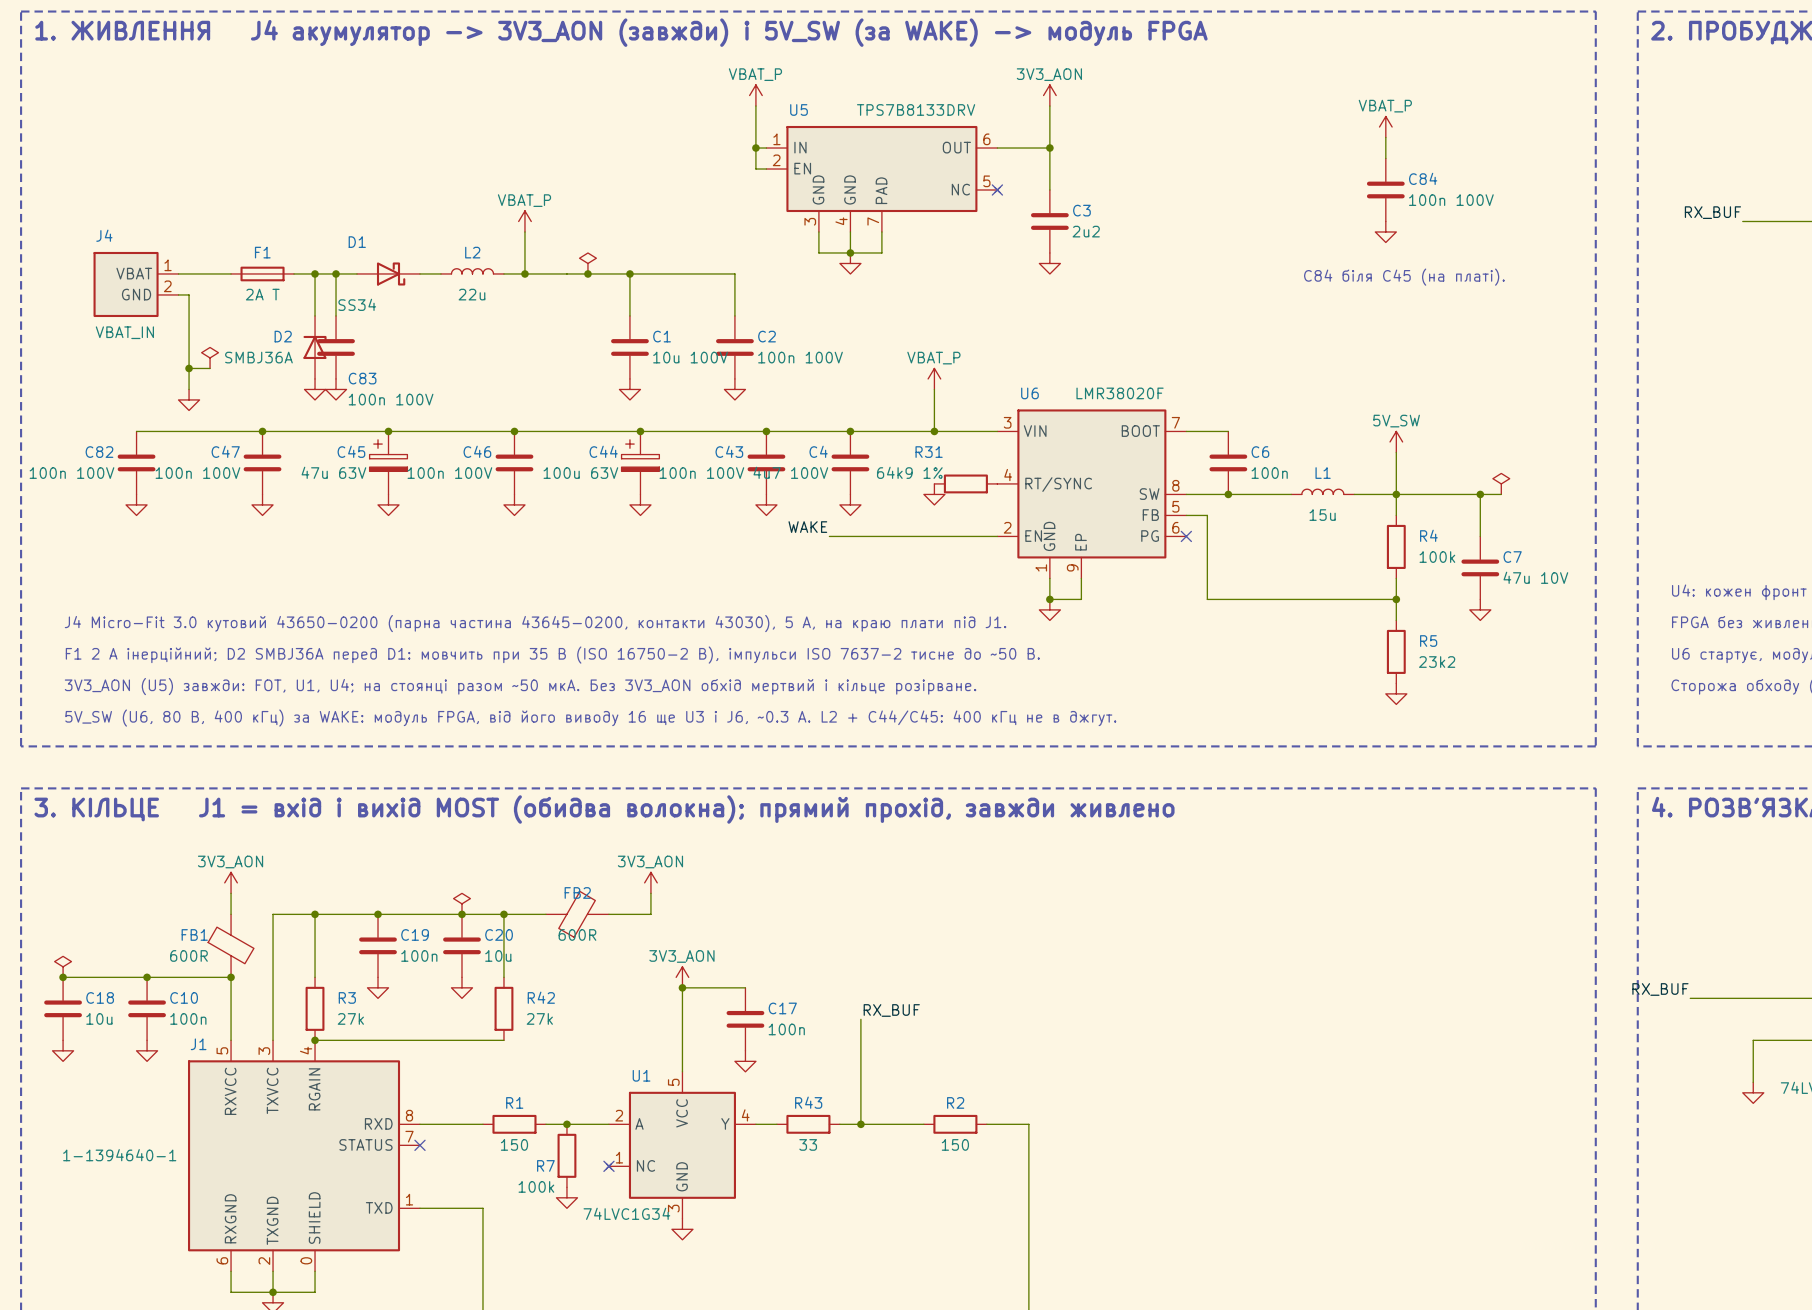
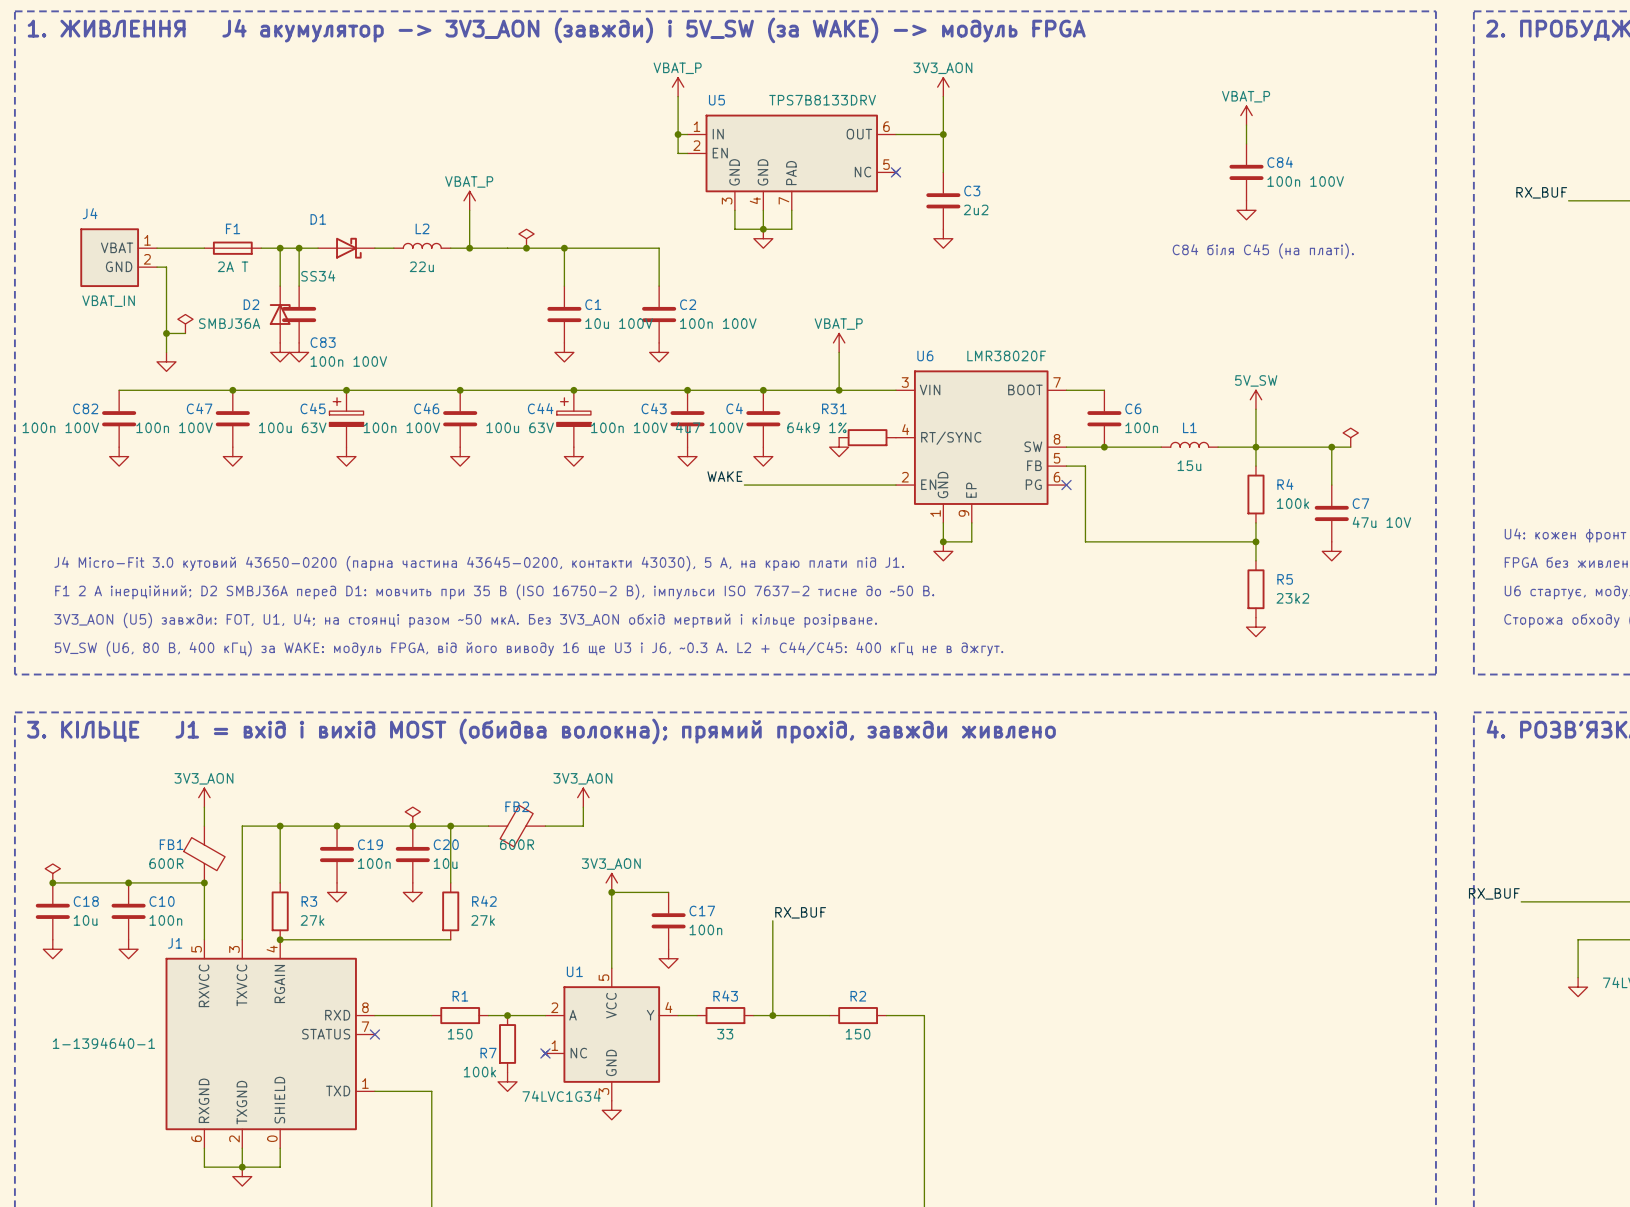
C45 value: 47u 63V (333, 472) -> 100u 63V (292, 427)

